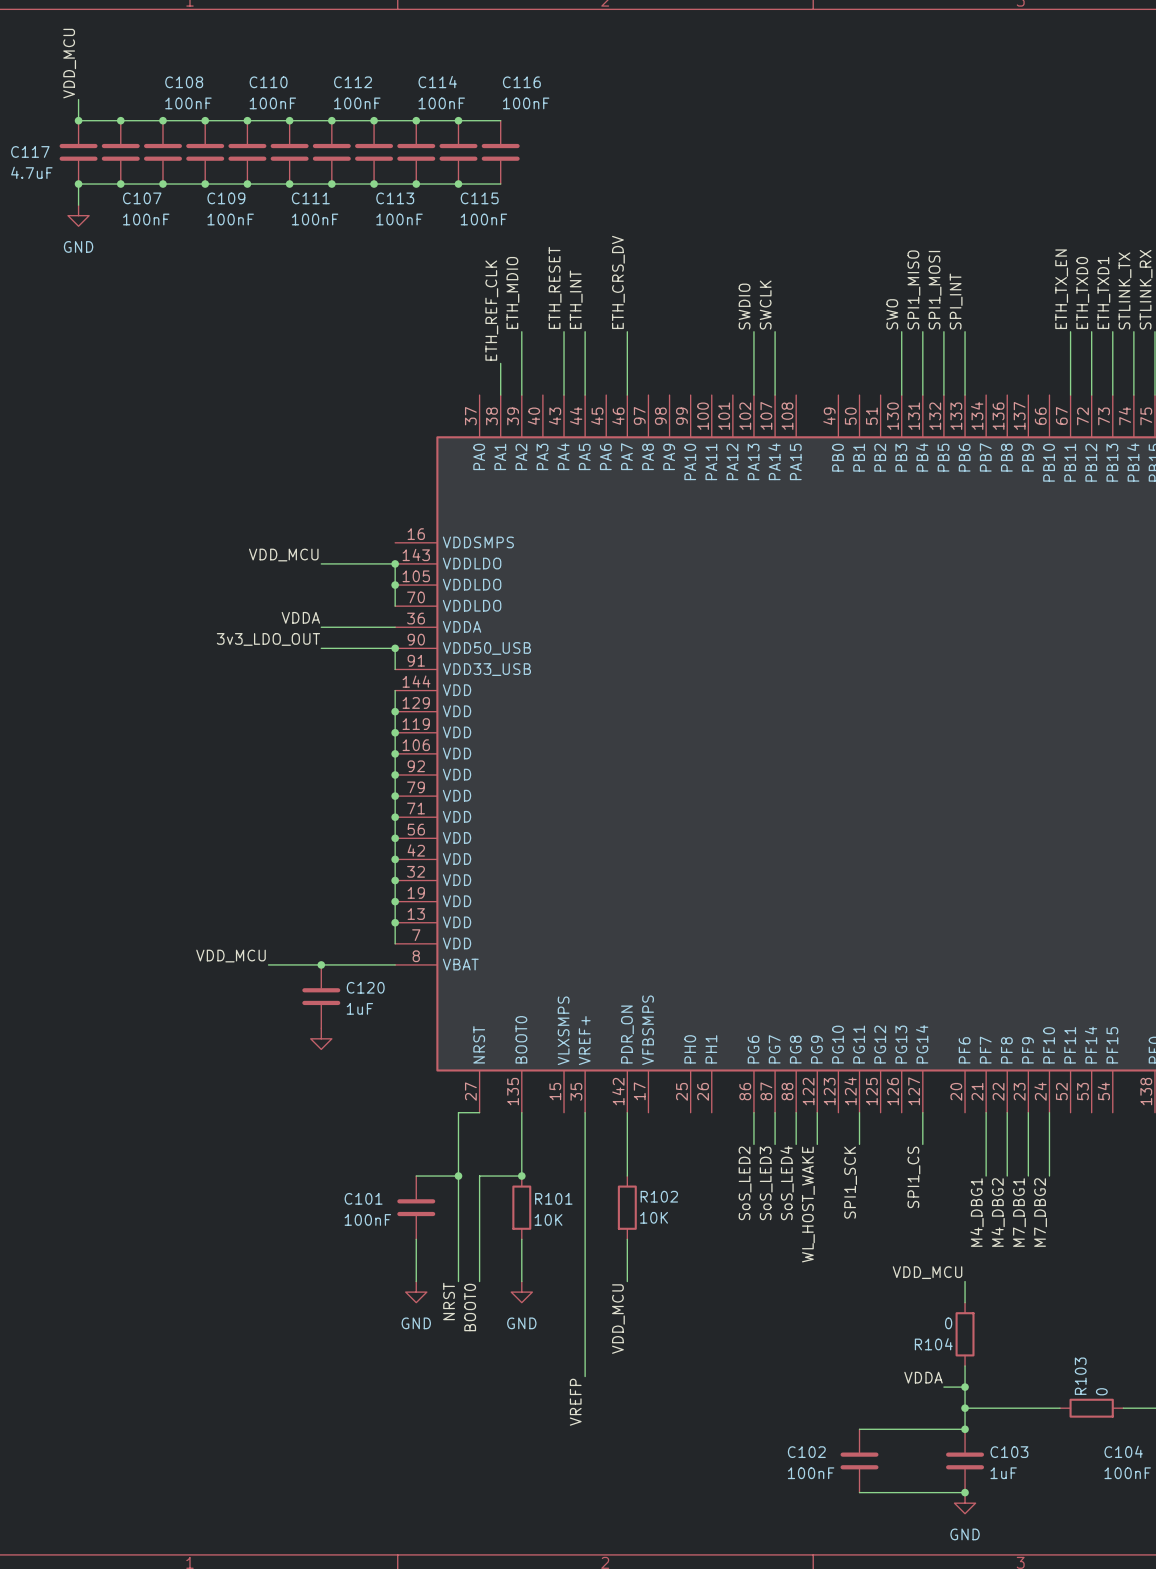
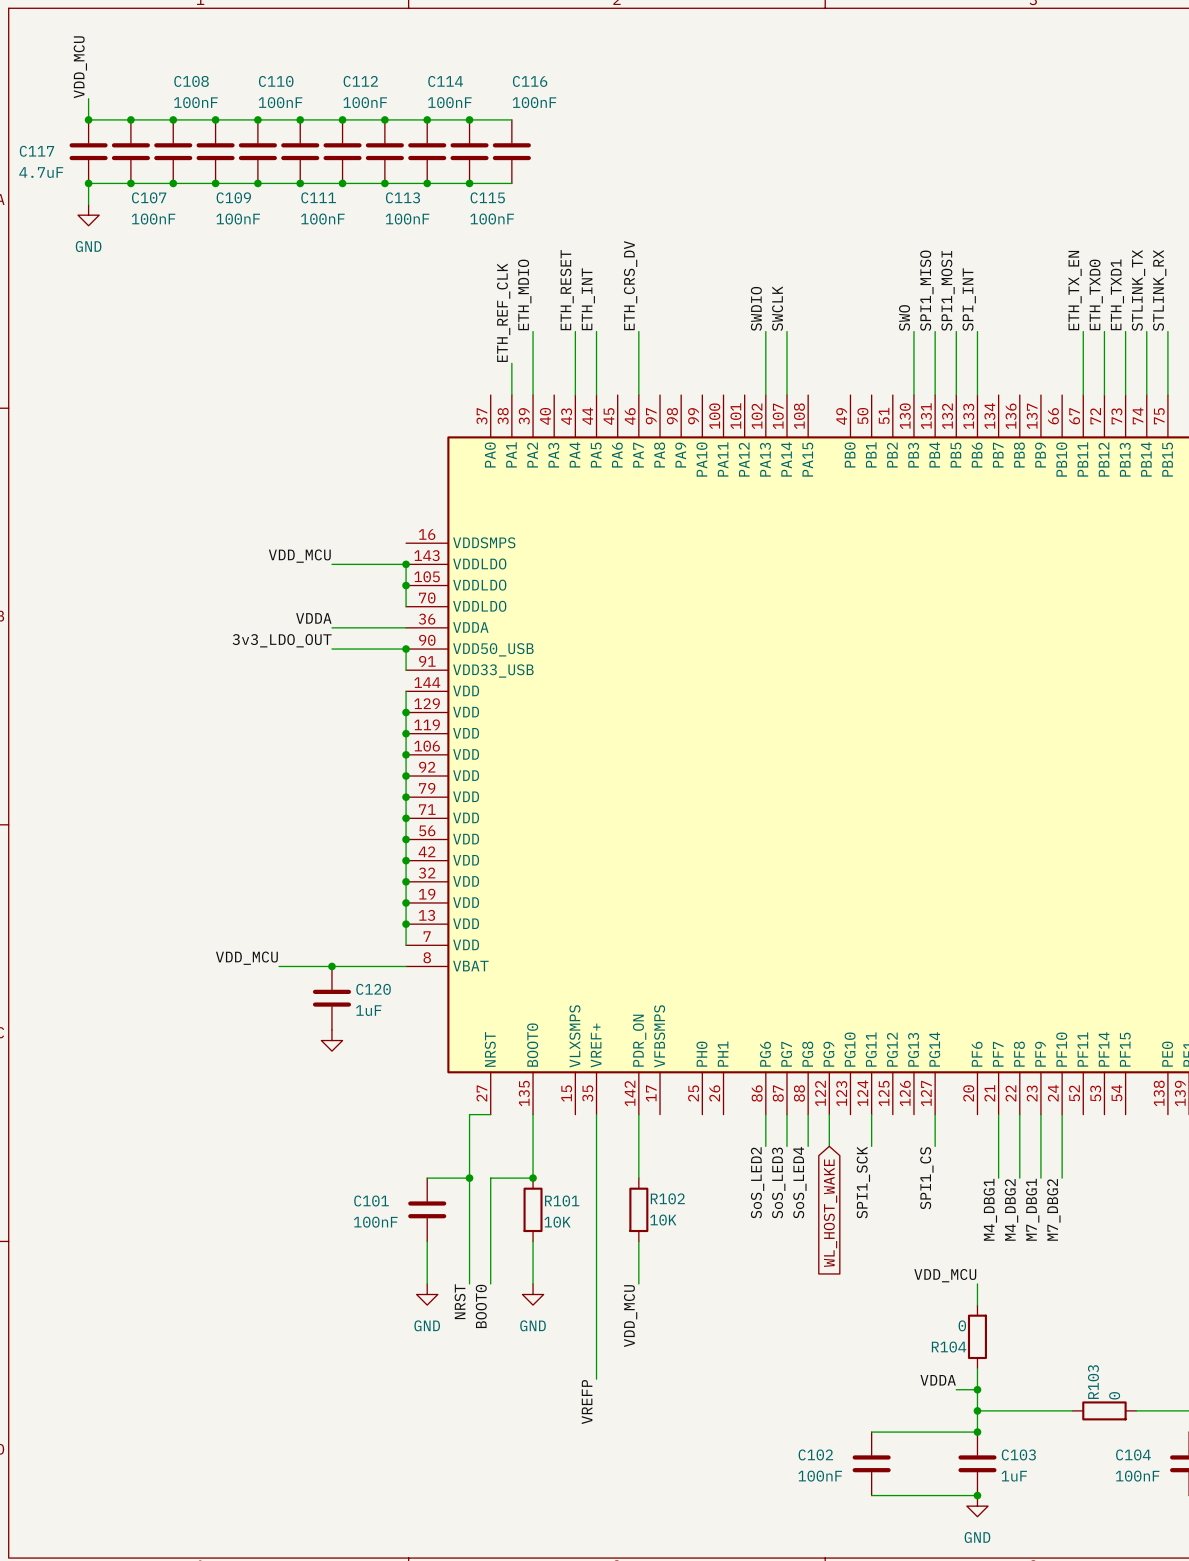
label: WL_HOST_WAKE (808, 1204) -> none
global label: none -> WL_HOST_WAKE (830, 1213)

